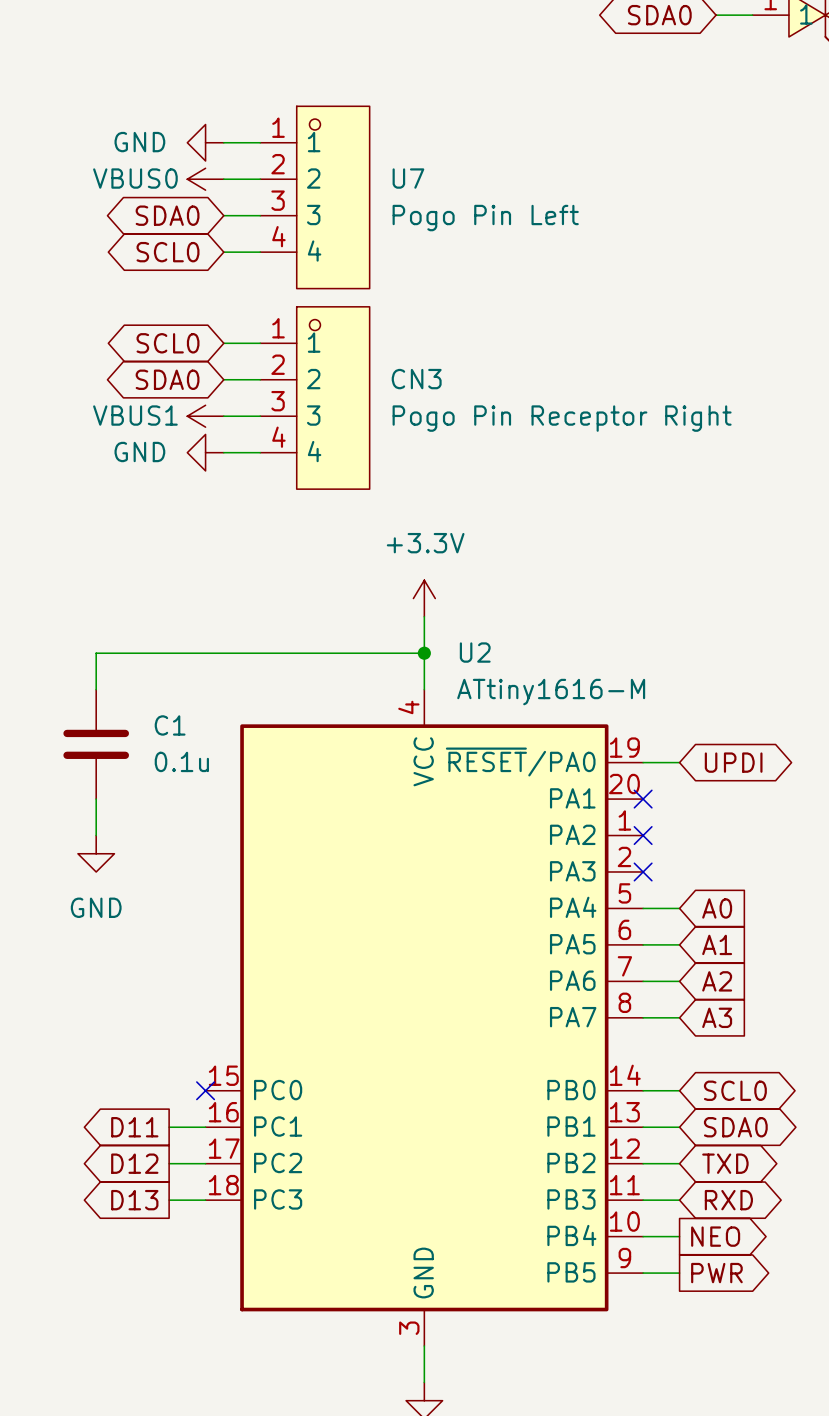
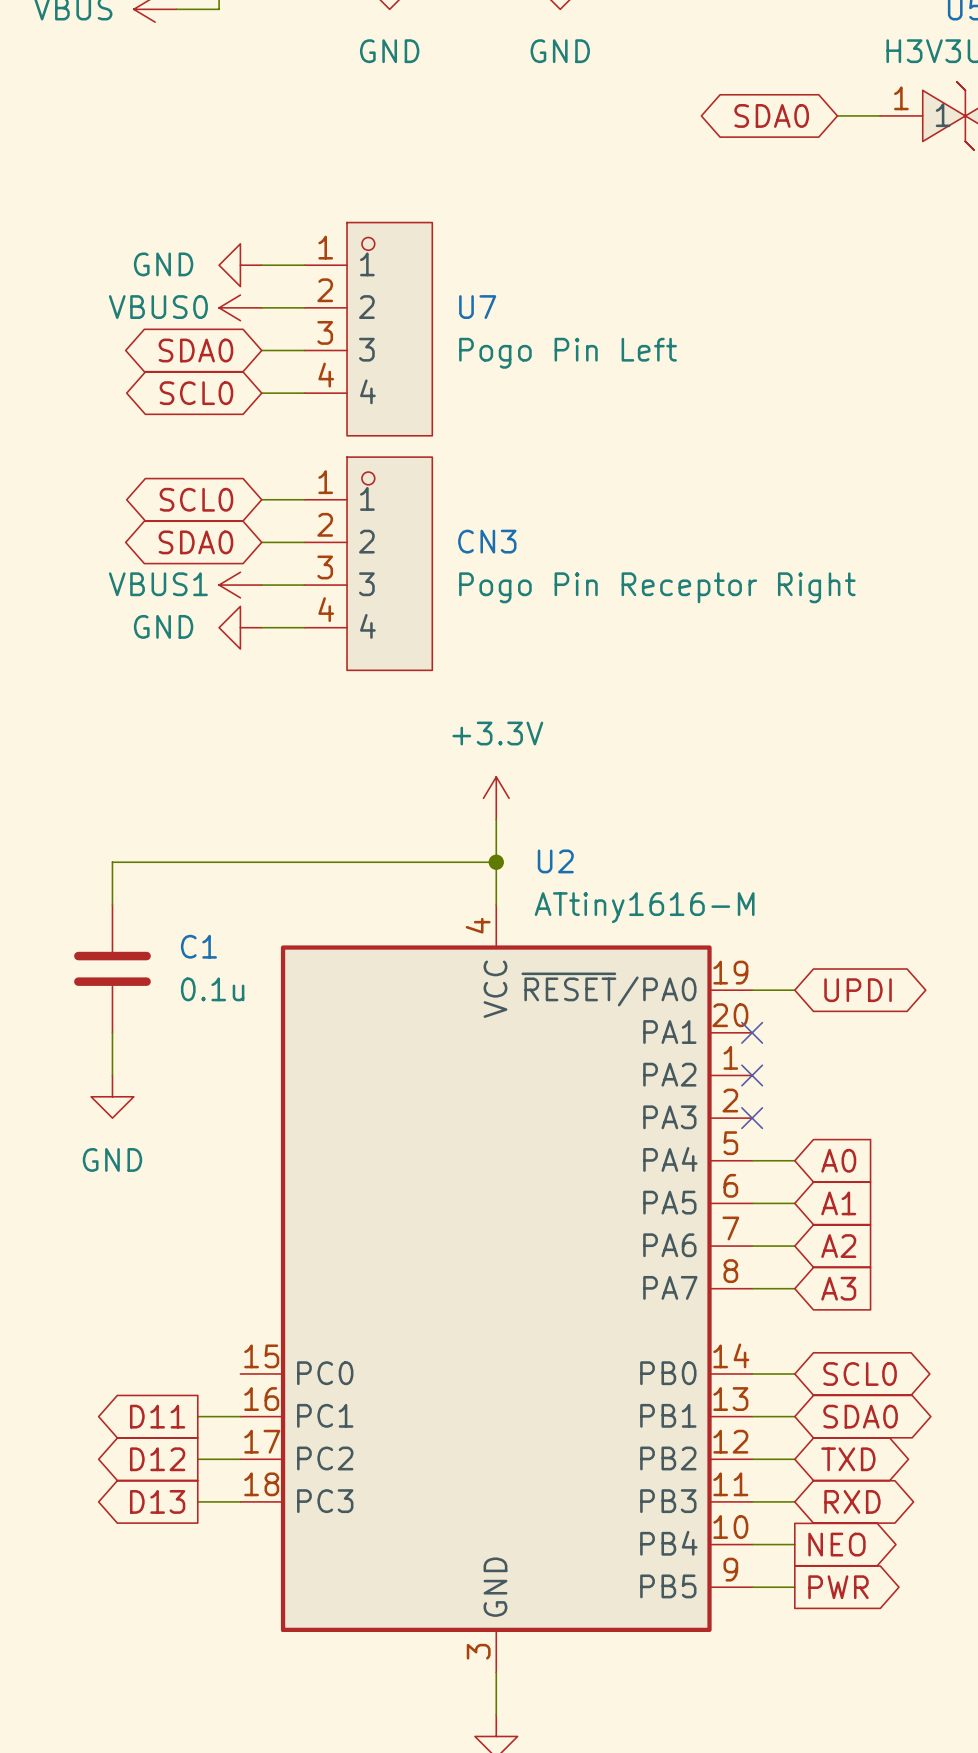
no-connect mark: (205, 1090) -> none

